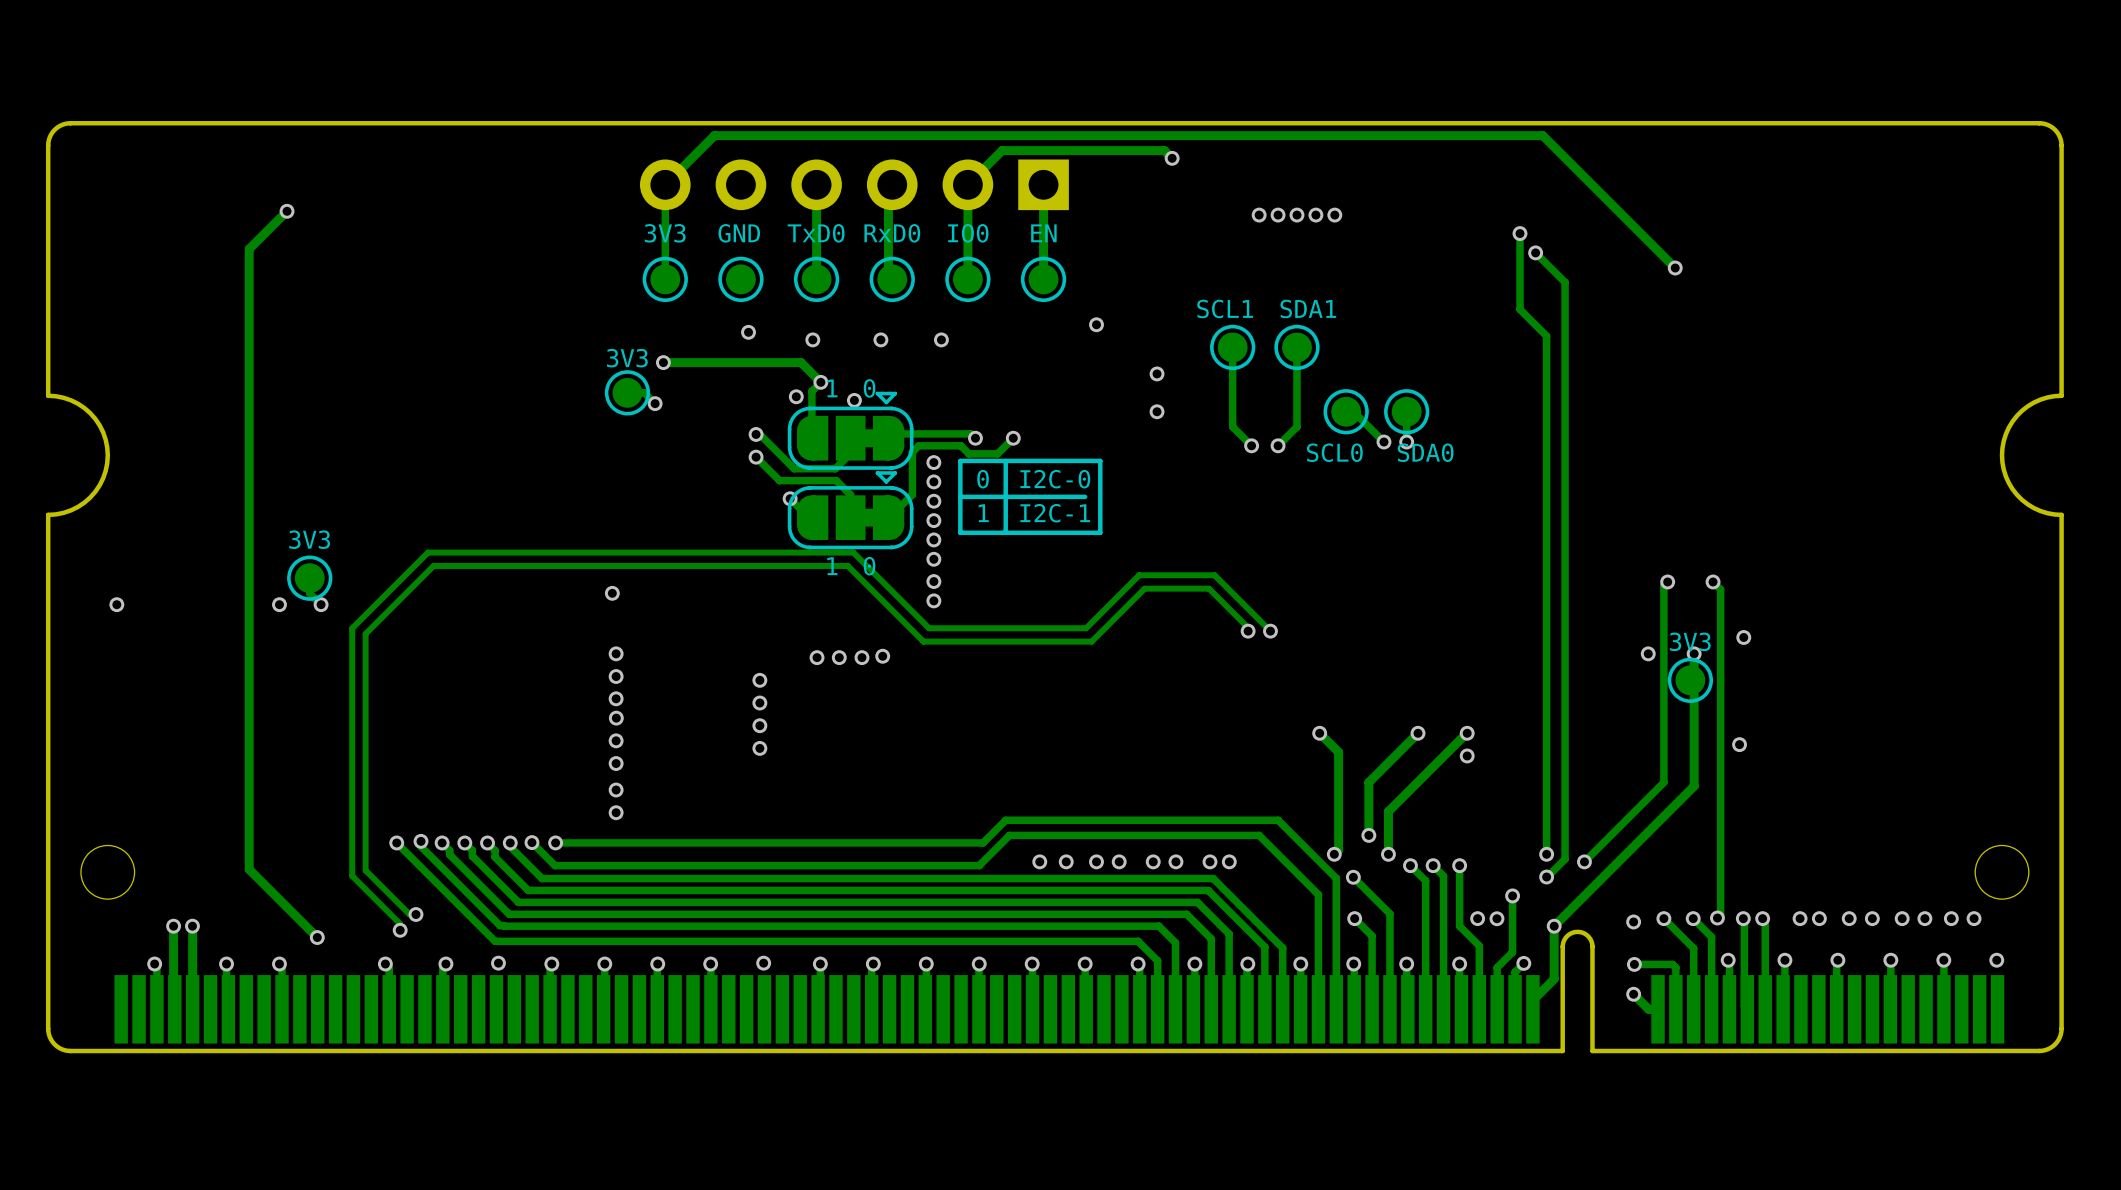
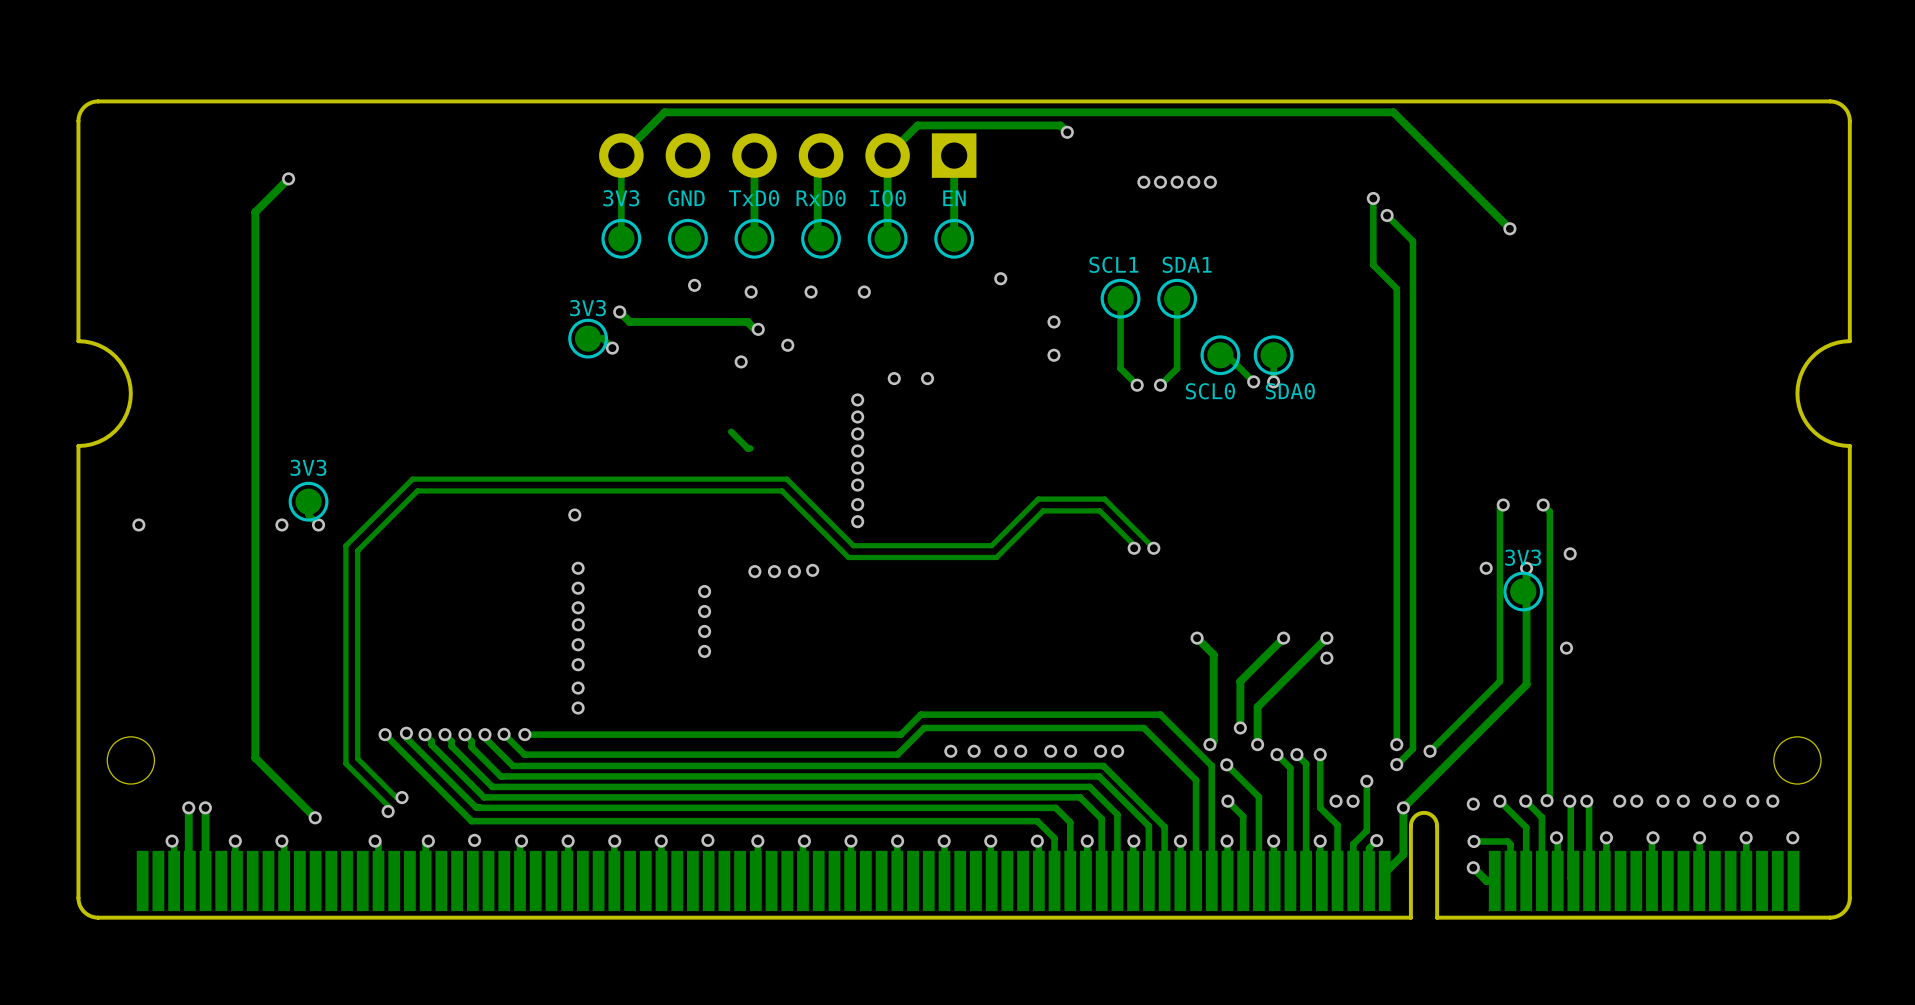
track: (663, 362) (801, 362) (820, 382) (811, 391) (811, 438) -> (619, 311) (629, 321) (747, 321) (754, 329)
text: 1 (832, 388) -> none
text: 0 (869, 388) -> none
via position: (796, 396) -> (741, 361)
part: (850, 430) -> none
track: (756, 434) (759, 434) (794, 468) (835, 468) (850, 453) (850, 438) -> none
via: (756, 434) -> none
track: (975, 438) (971, 433) (893, 433) (889, 438) -> none
track: (1013, 438) (997, 453) (968, 453) (960, 445) (918, 445) (912, 452) (912, 494) (889, 517) -> none
track: (756, 457) (779, 480) (836, 480) (850, 494) (850, 517) -> none
via: (756, 457) -> none
line: (1005, 460) (1005, 532) -> none
line: (1100, 460) (1100, 532) (960, 532) (960, 460) (1100, 460) -> none
text: 0 (983, 479) -> none
text: I2C-0 (1055, 479) -> none
line: (1085, 496) (960, 496) -> none
via: (790, 498) -> none
part: (850, 510) -> none
text: 1 (983, 513) -> none
text: I2C-1 (1055, 513) -> none
text: 1 (832, 566) -> none
text: 0 (869, 566) -> none

